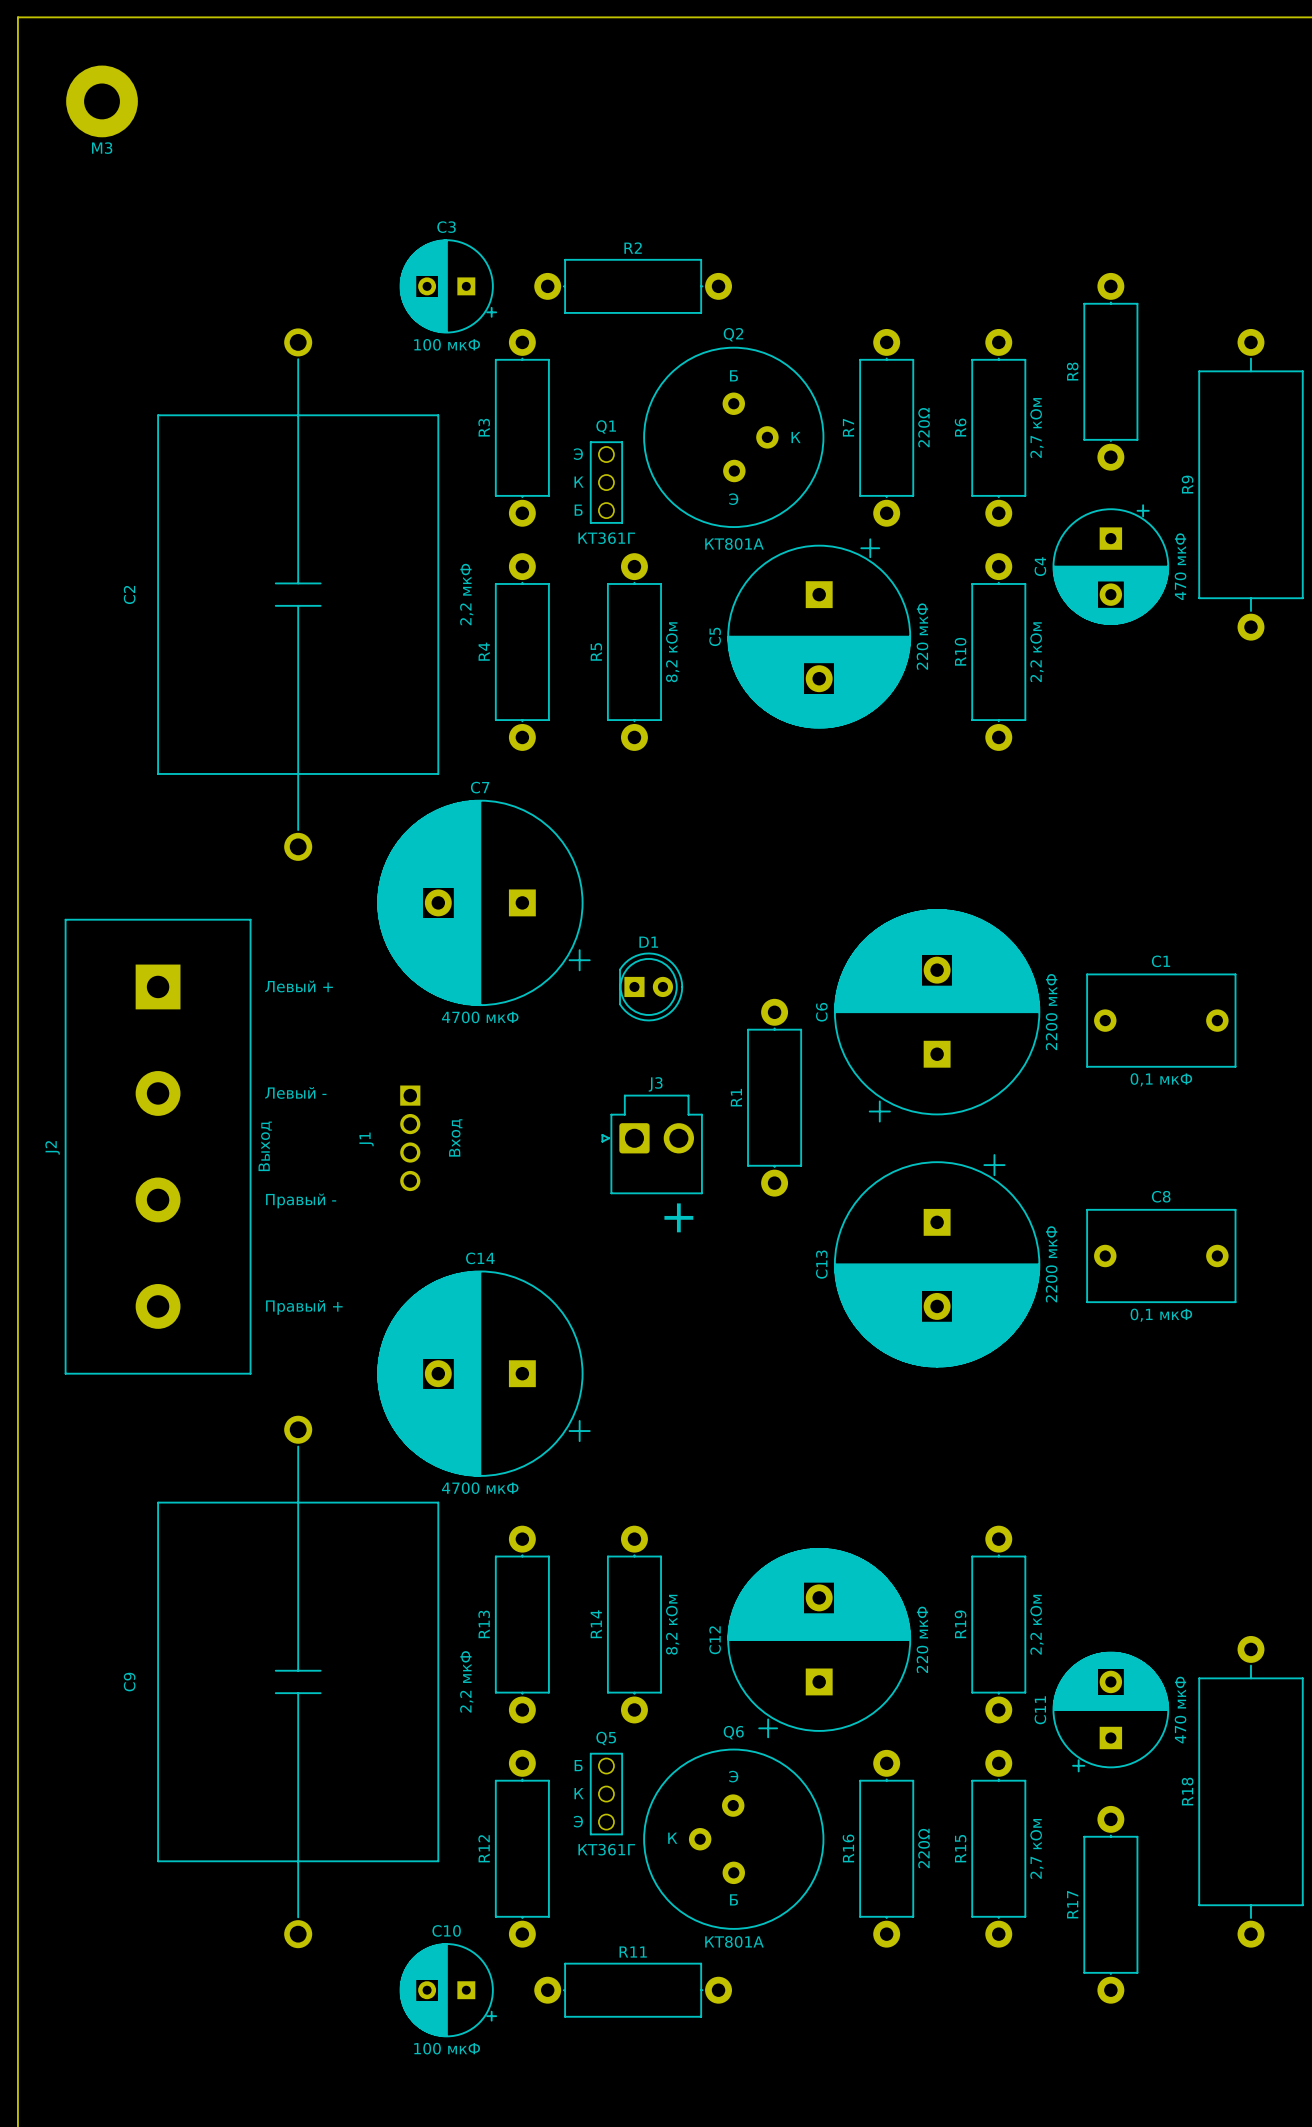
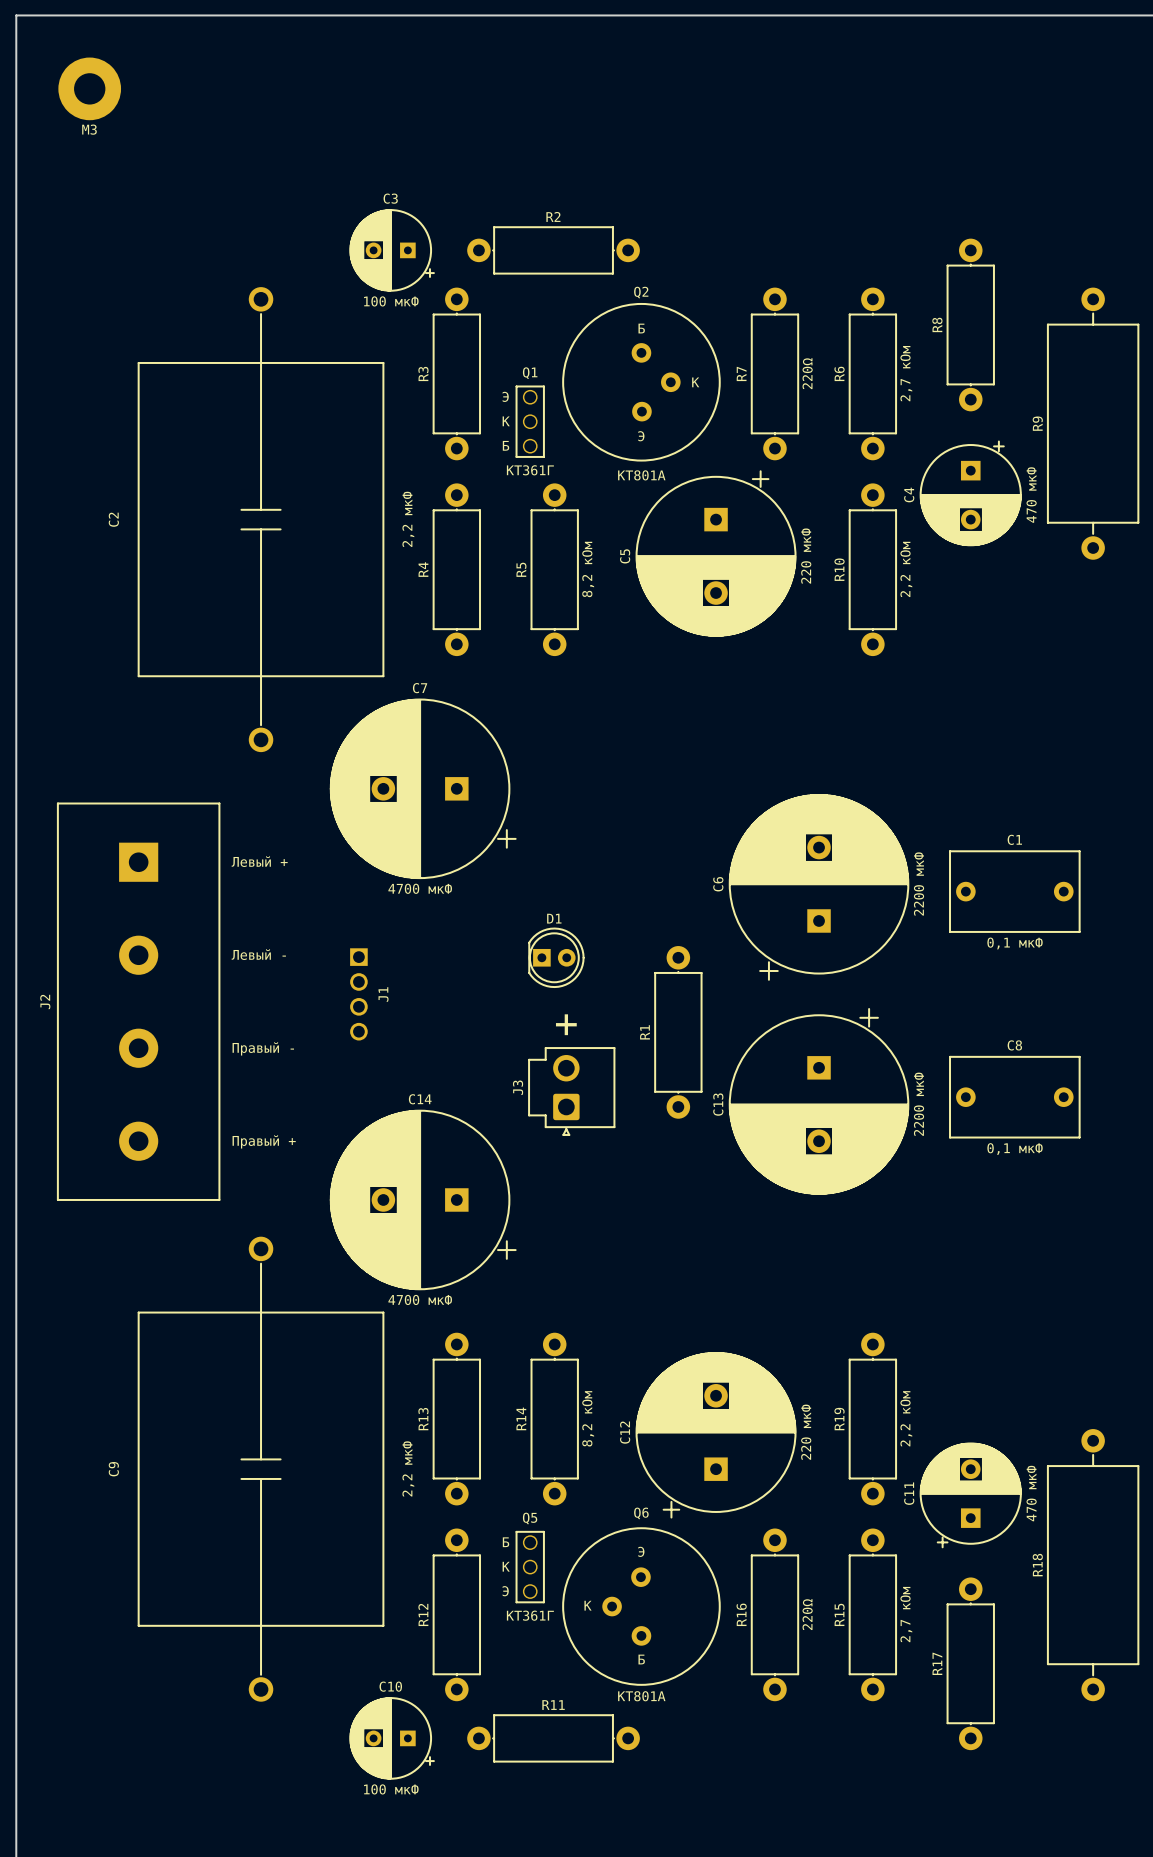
D1 position: (651, 986) -> (556, 957)
R1 position: (774, 1097) -> (678, 1032)
J1 value: Вход (455, 1137) -> none
J1 name position: J1 (366, 1139) -> J1 (383, 994)
J3 rotation: 0° (652, 1144) -> 90° counterclockwise (571, 1091)
J3 position: (652, 1144) -> (571, 1091)
J2 value: Выход (265, 1146) -> none
text position: + (678, 1217) -> + (566, 1024)

